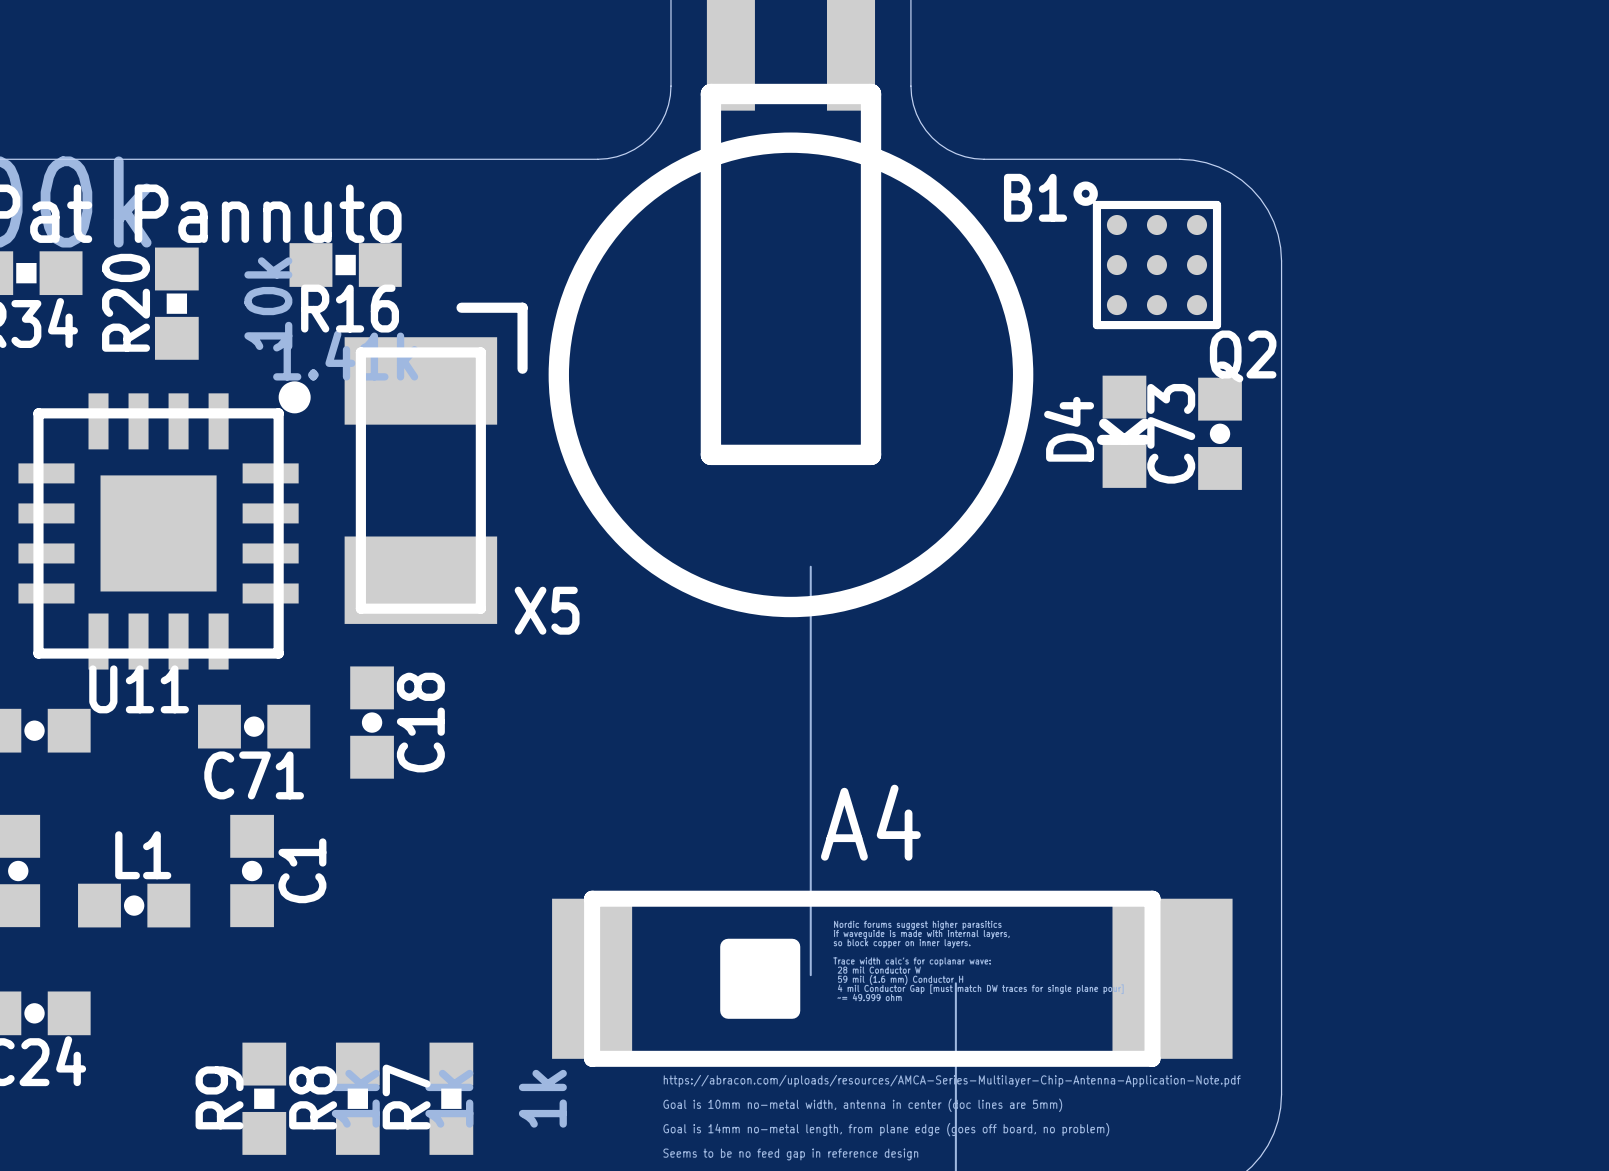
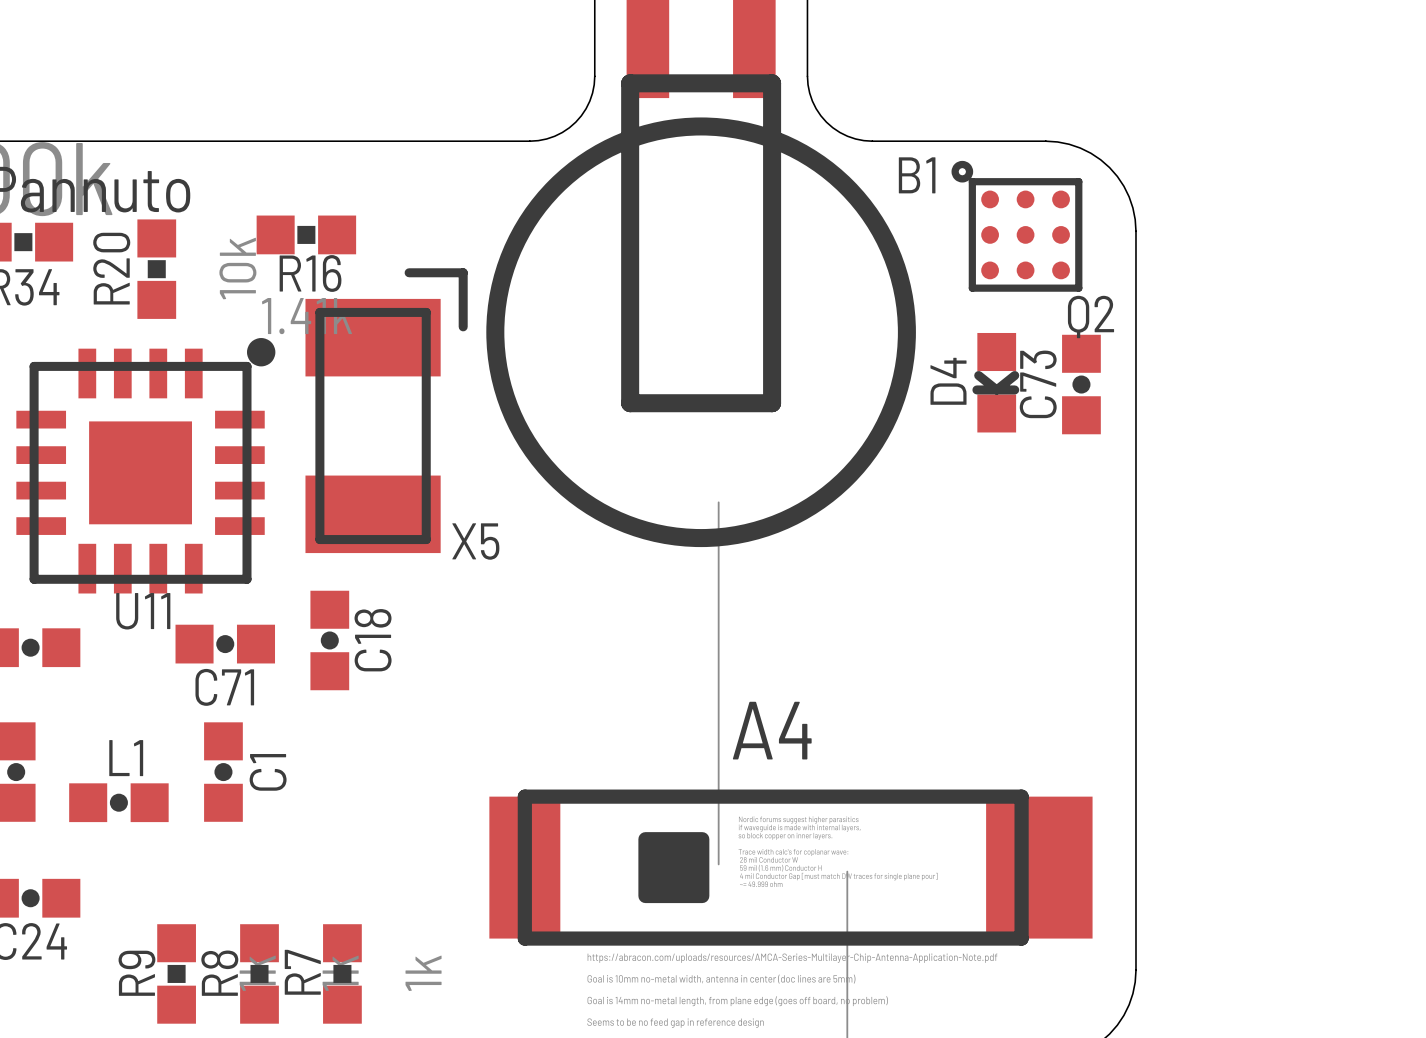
R9 position: (264, 1098) -> (176, 973)
R8 position: (357, 1098) -> (259, 973)
R7 position: (451, 1098) -> (342, 973)

